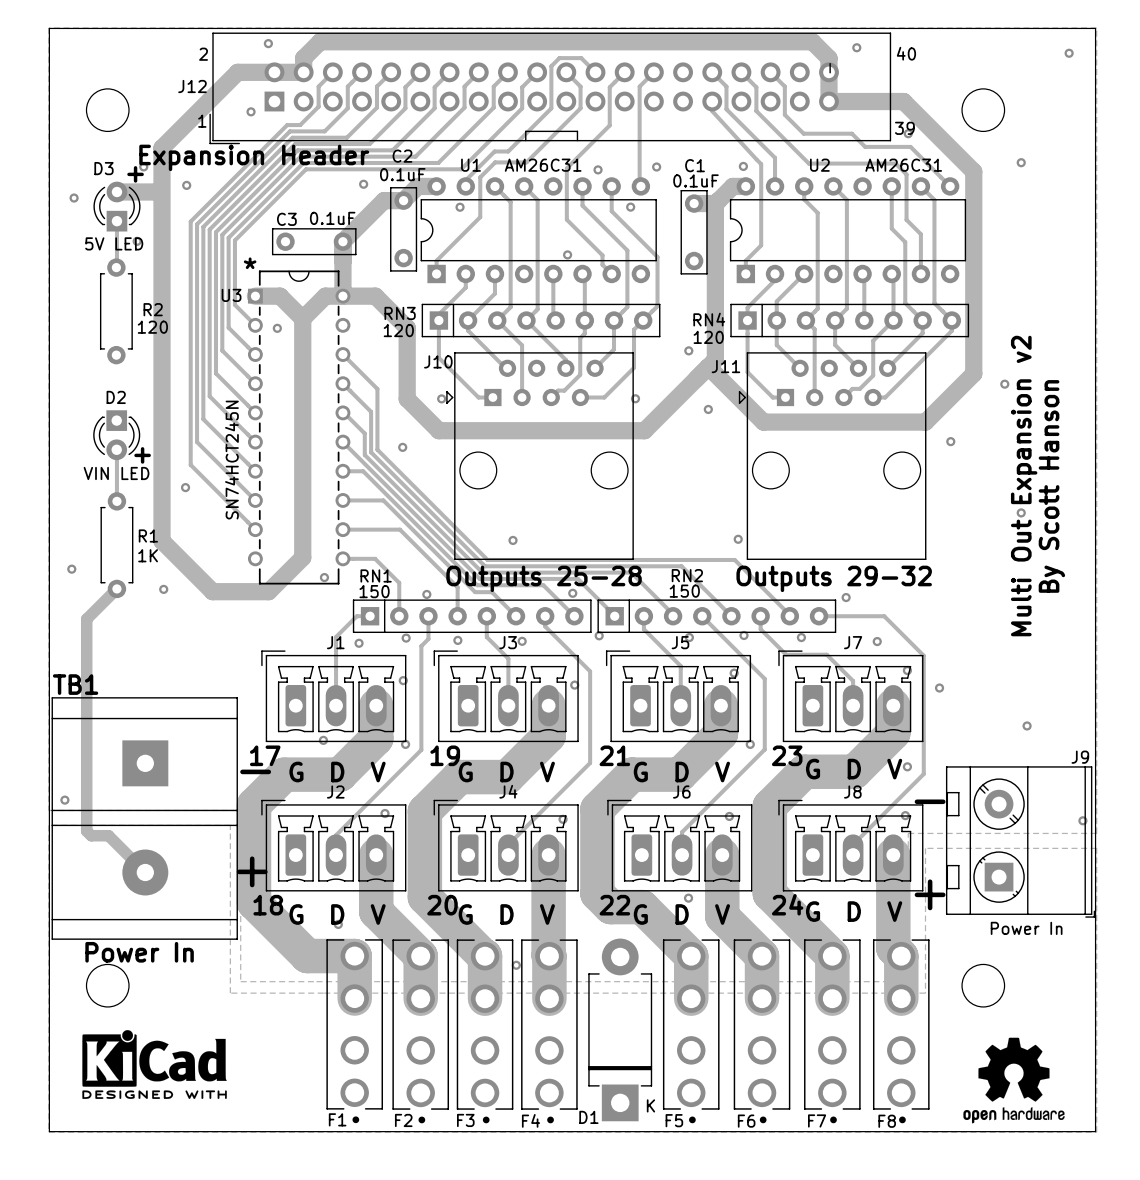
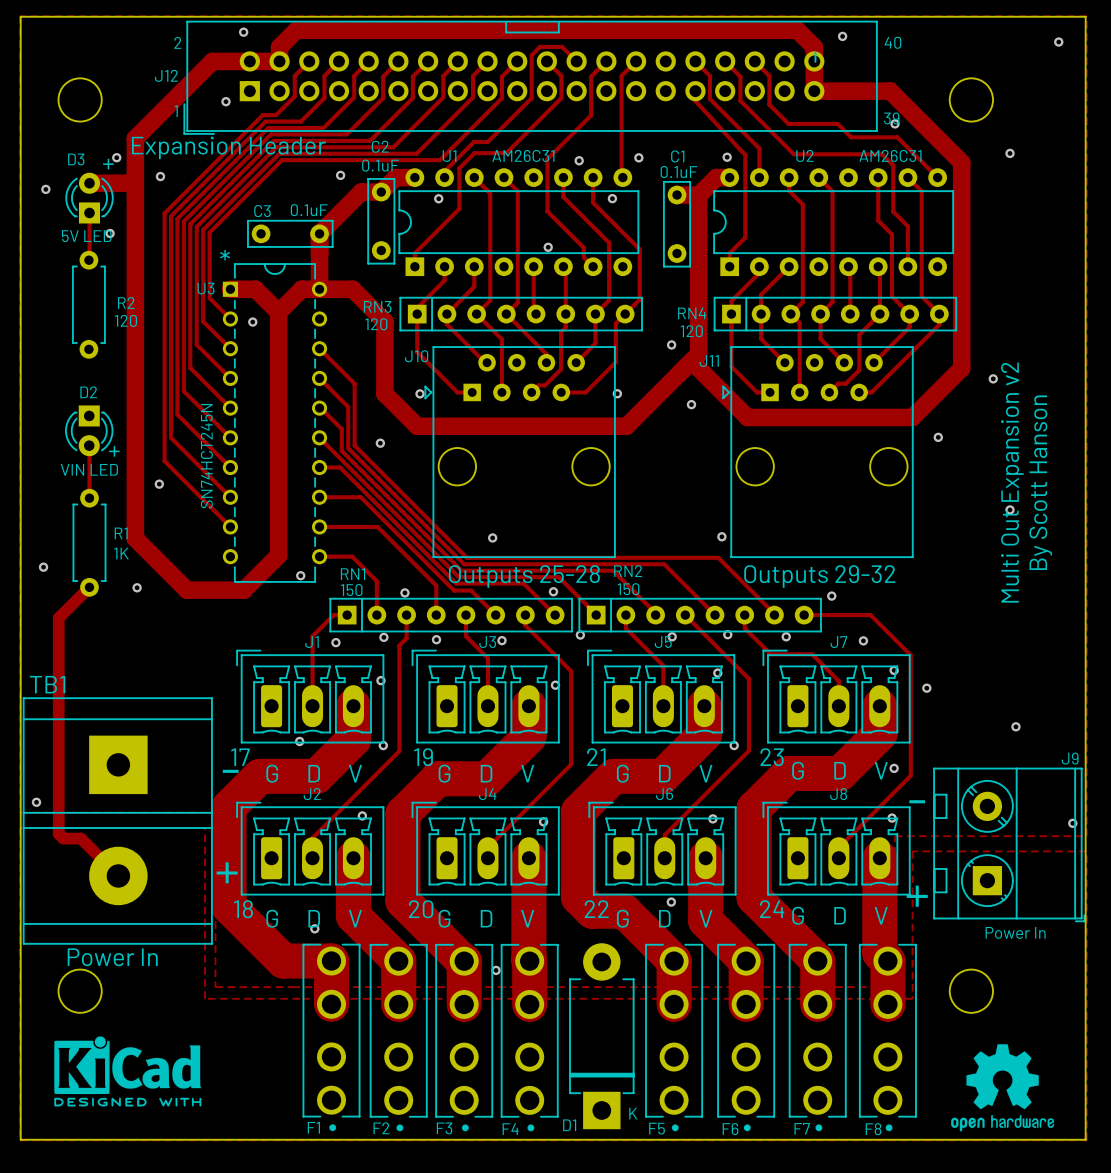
line: none -> (506, 23) (506, 32) (558, 32) (558, 23)
line: (525, 140) (525, 131) (577, 131) (577, 140) -> none
RN2 name position: RN2 (687, 575) -> RN2 (628, 571)
RN2 value position: 150 (684, 591) -> 150 (628, 589)
TB1 footprint: [51, 697, 238, 940] -> [22, 697, 213, 945]

